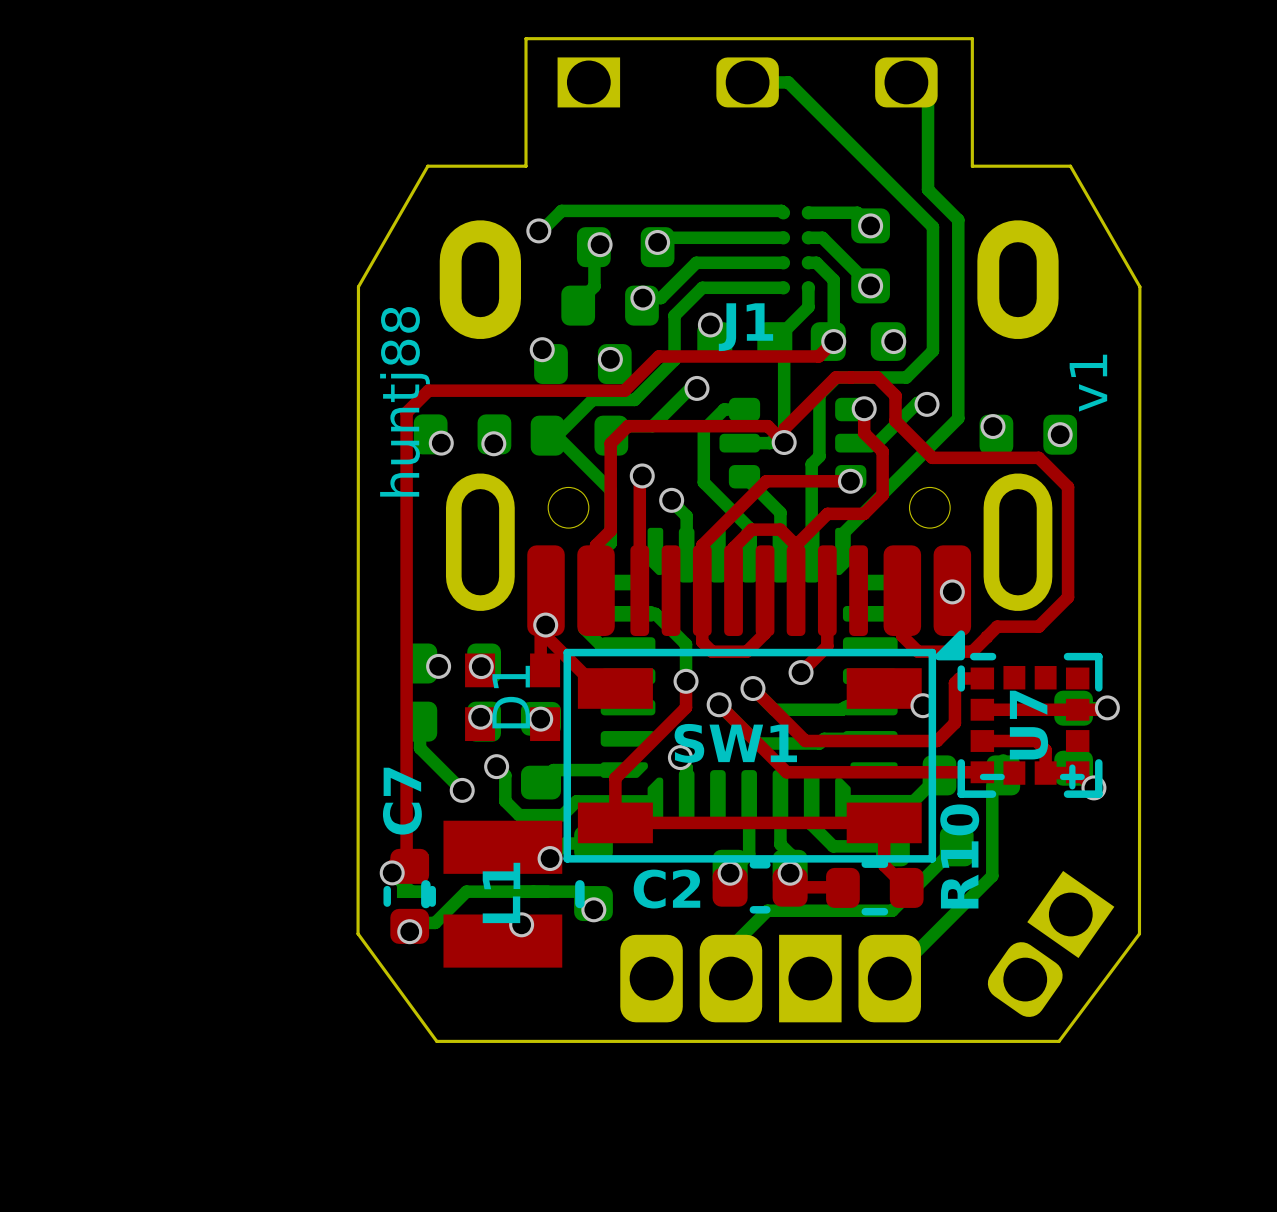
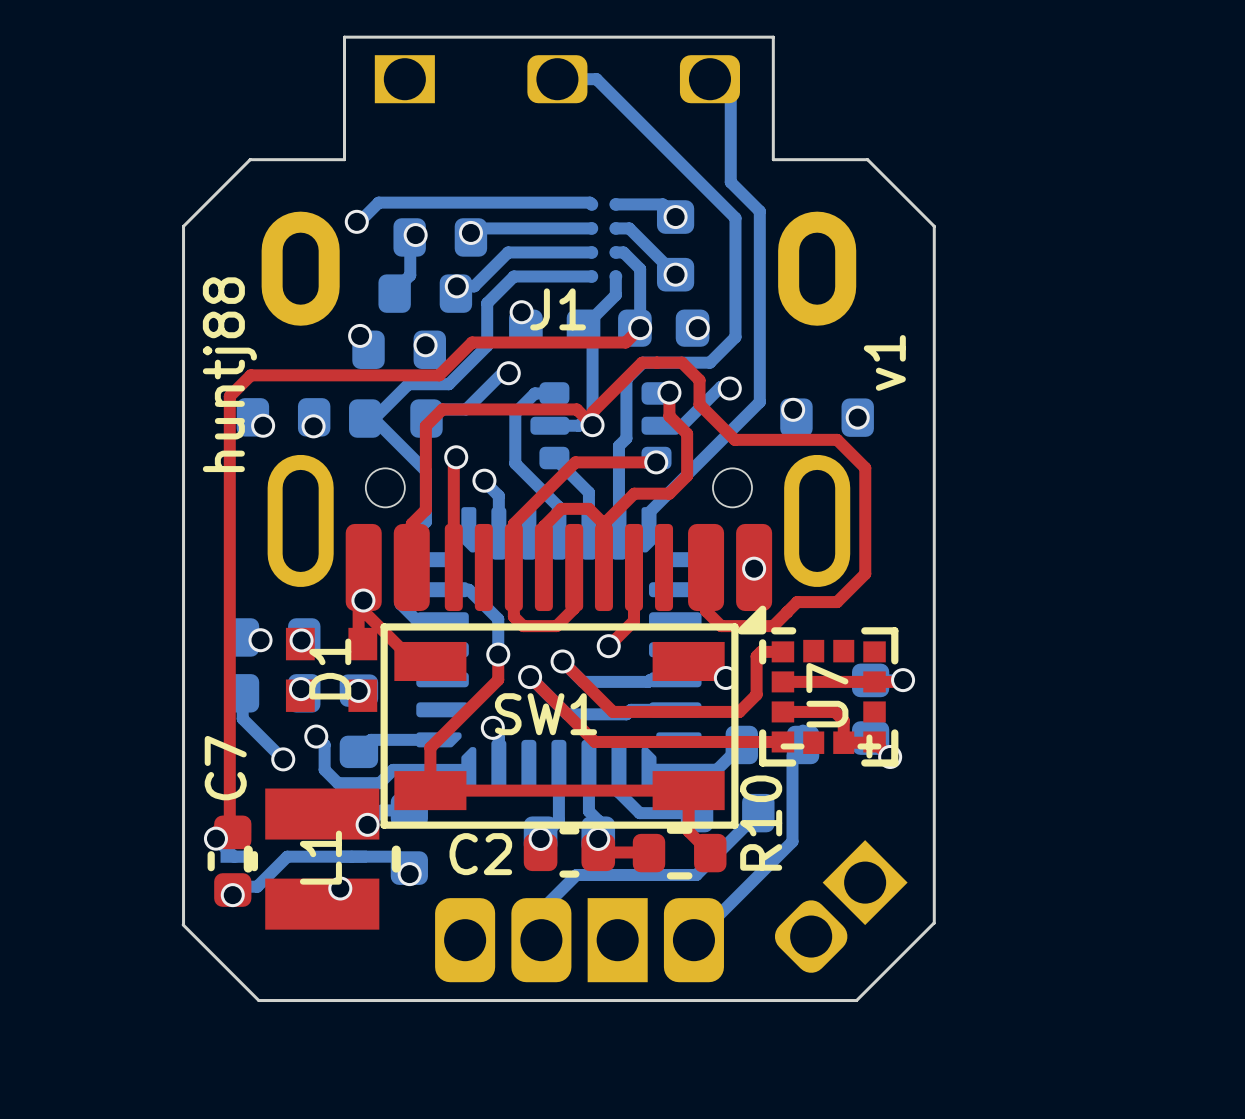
board edge: (427, 166) (358, 286) (358, 933) (436, 1041) -> (250, 159) (183, 226) (183, 924)
board edge: (1070, 166) (1139, 286) (1139, 933) (1059, 1041) -> (867, 159) (934, 226) (934, 923)
part rotation: 0° (1070, 914) -> 10° clockwise (865, 882)
board edge: none -> (933, 923) (856, 1000)
board edge: none -> (183, 924) (258, 1000)
part rotation: 0° (1025, 979) -> 10° clockwise (811, 936)

